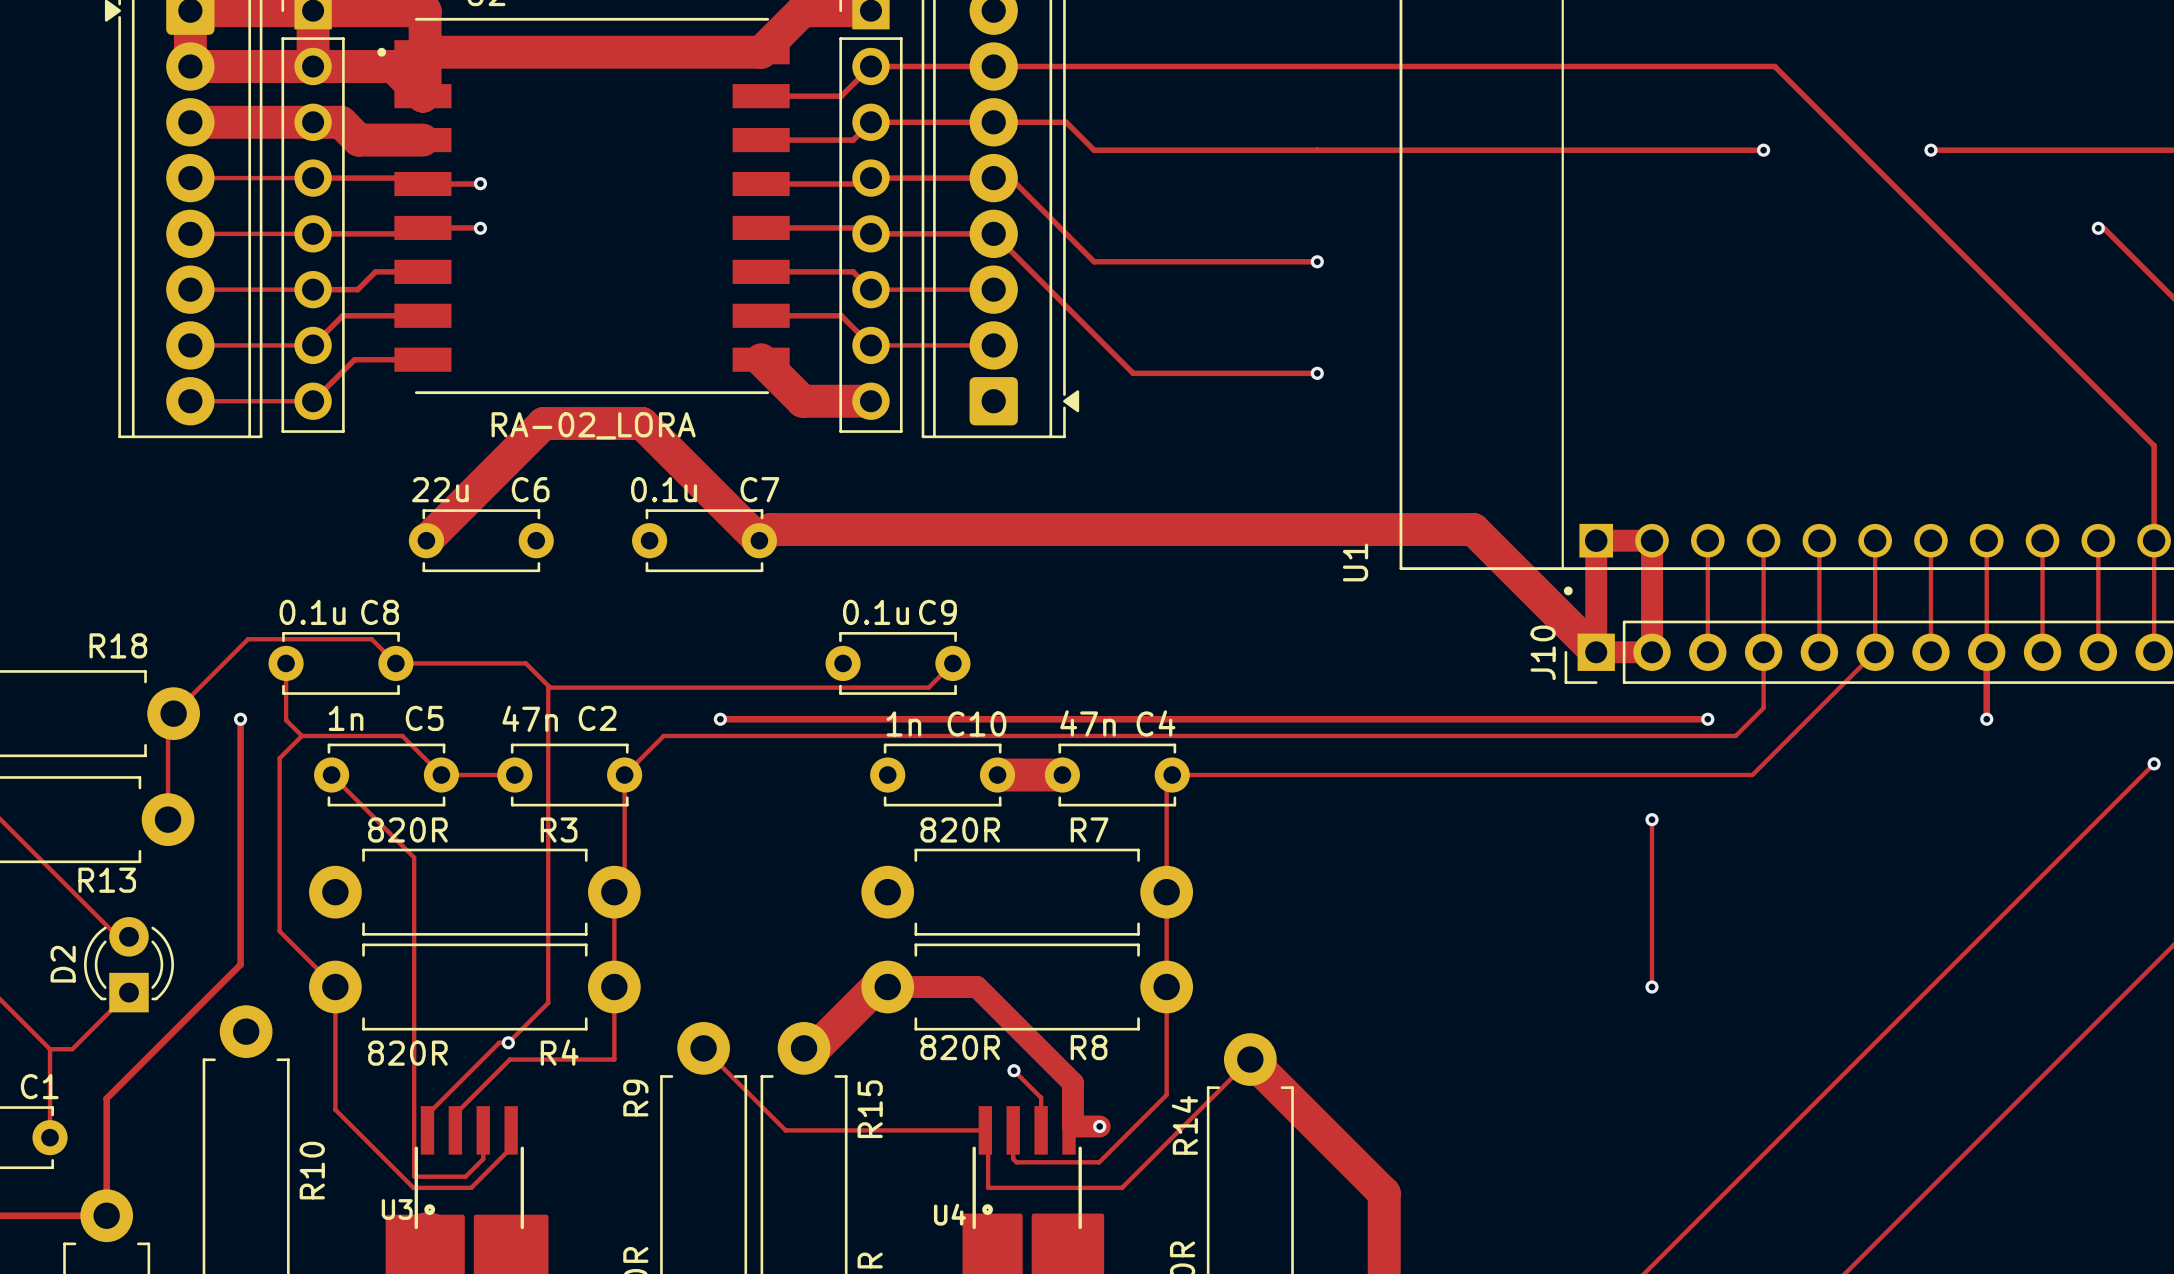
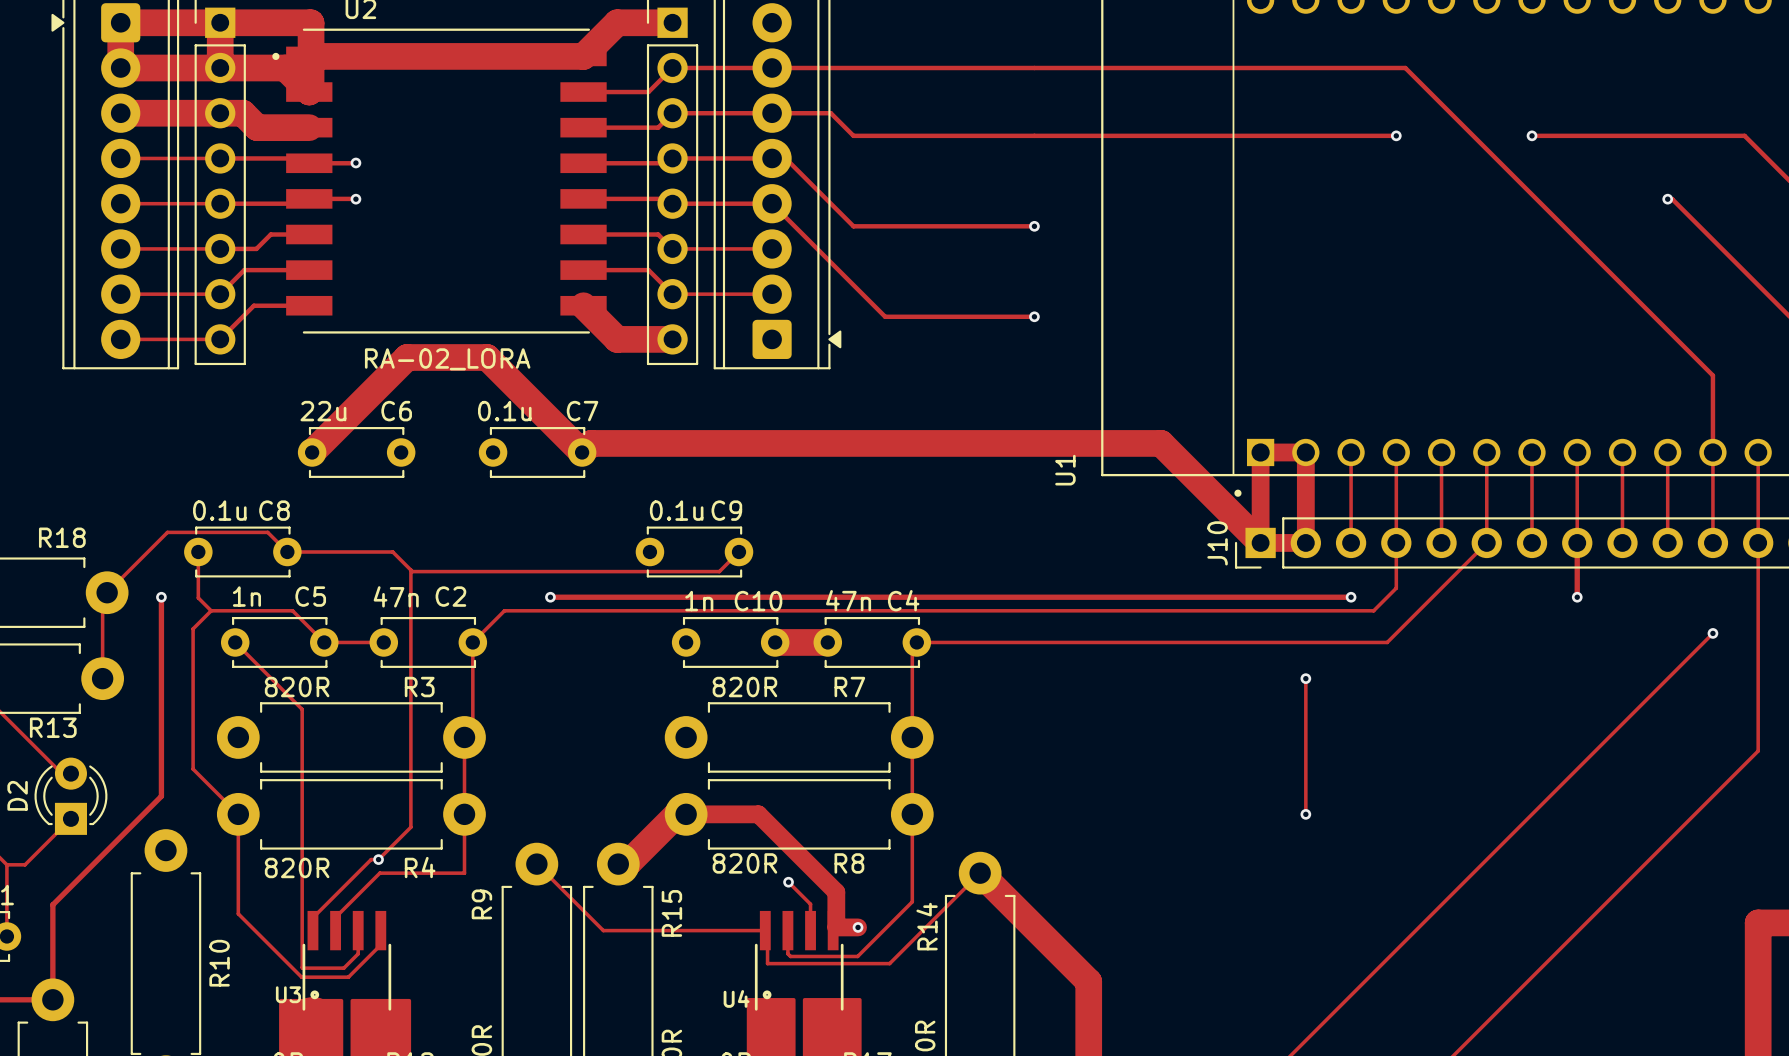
track: (988, 1171) (988, 1187) (1122, 1187) (1138, 1171) -> (767, 963) (889, 963)

